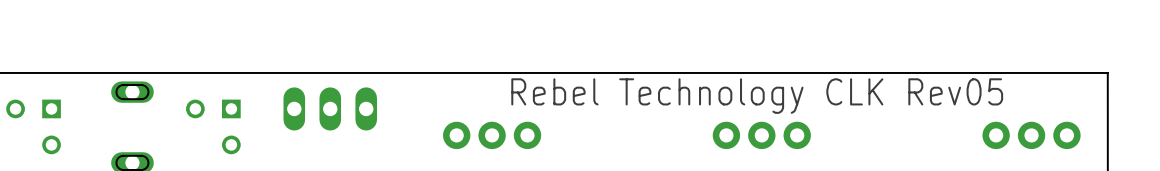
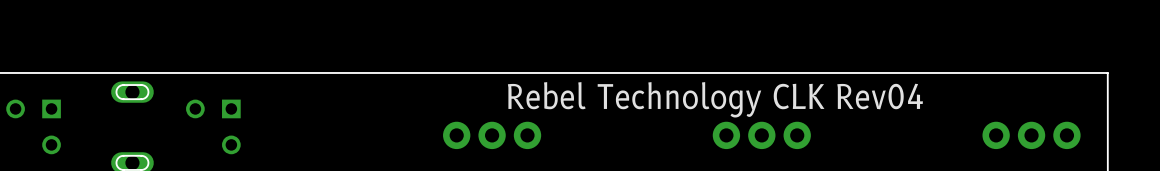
text: Rebel Technology CLK Rev05 (757, 96) -> Rebel Technology CLK Rev04 (715, 99)
part: (330, 108) -> none

